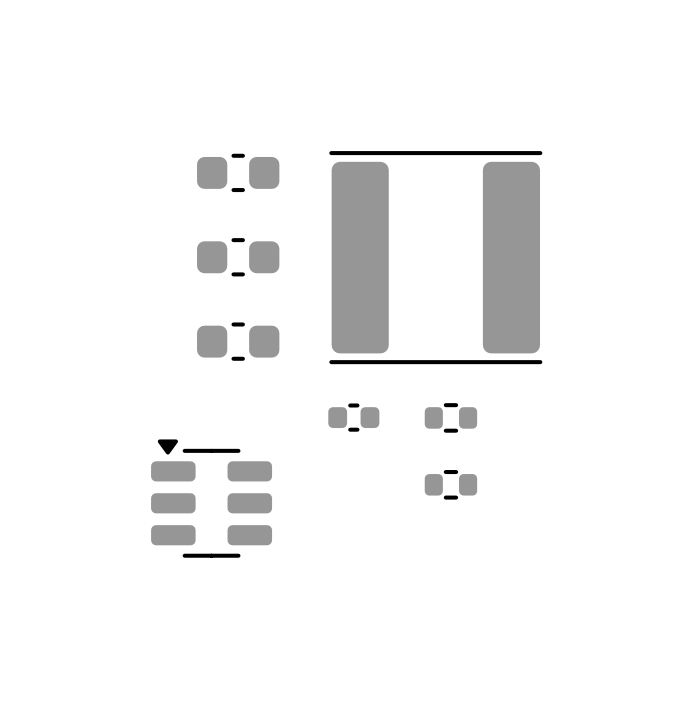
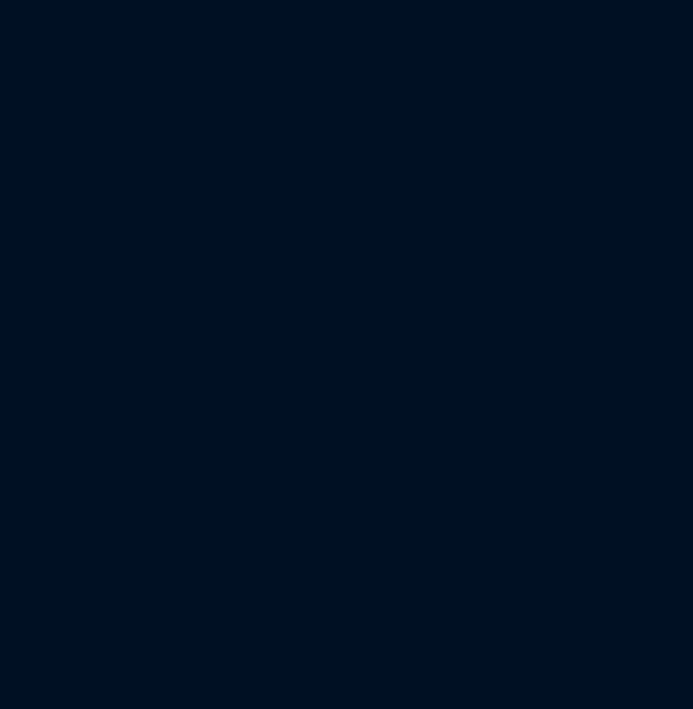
part: (238, 172) -> none
part: (238, 257) -> none
part: (435, 257) -> none
part: (238, 341) -> none
part: (353, 417) -> none
part: (450, 417) -> none
part: (450, 484) -> none
part: (211, 498) -> none

